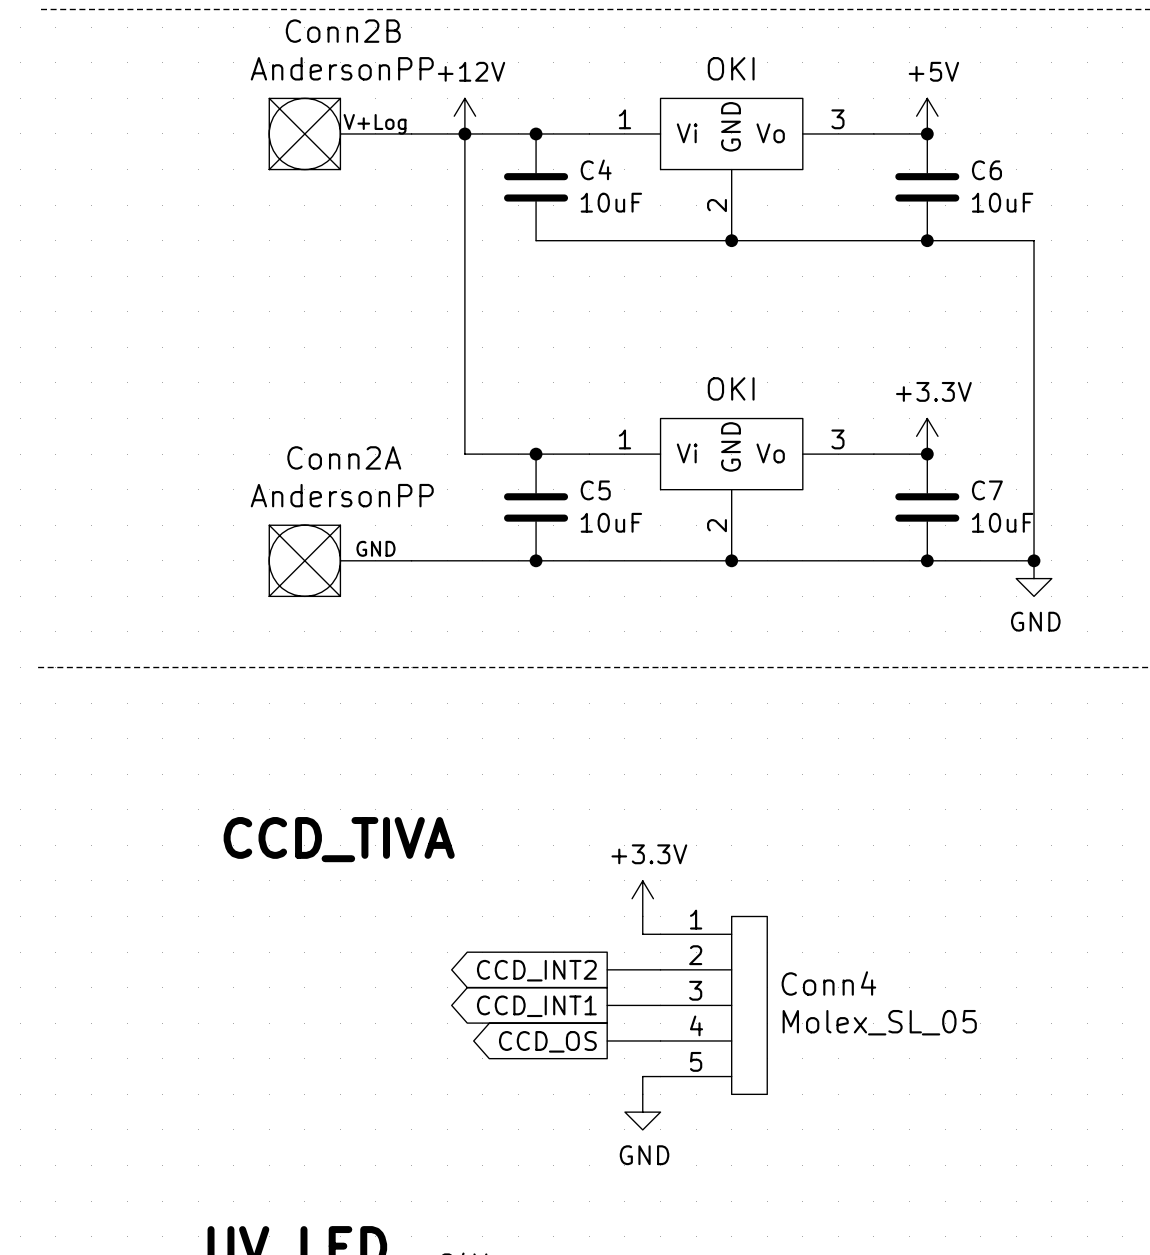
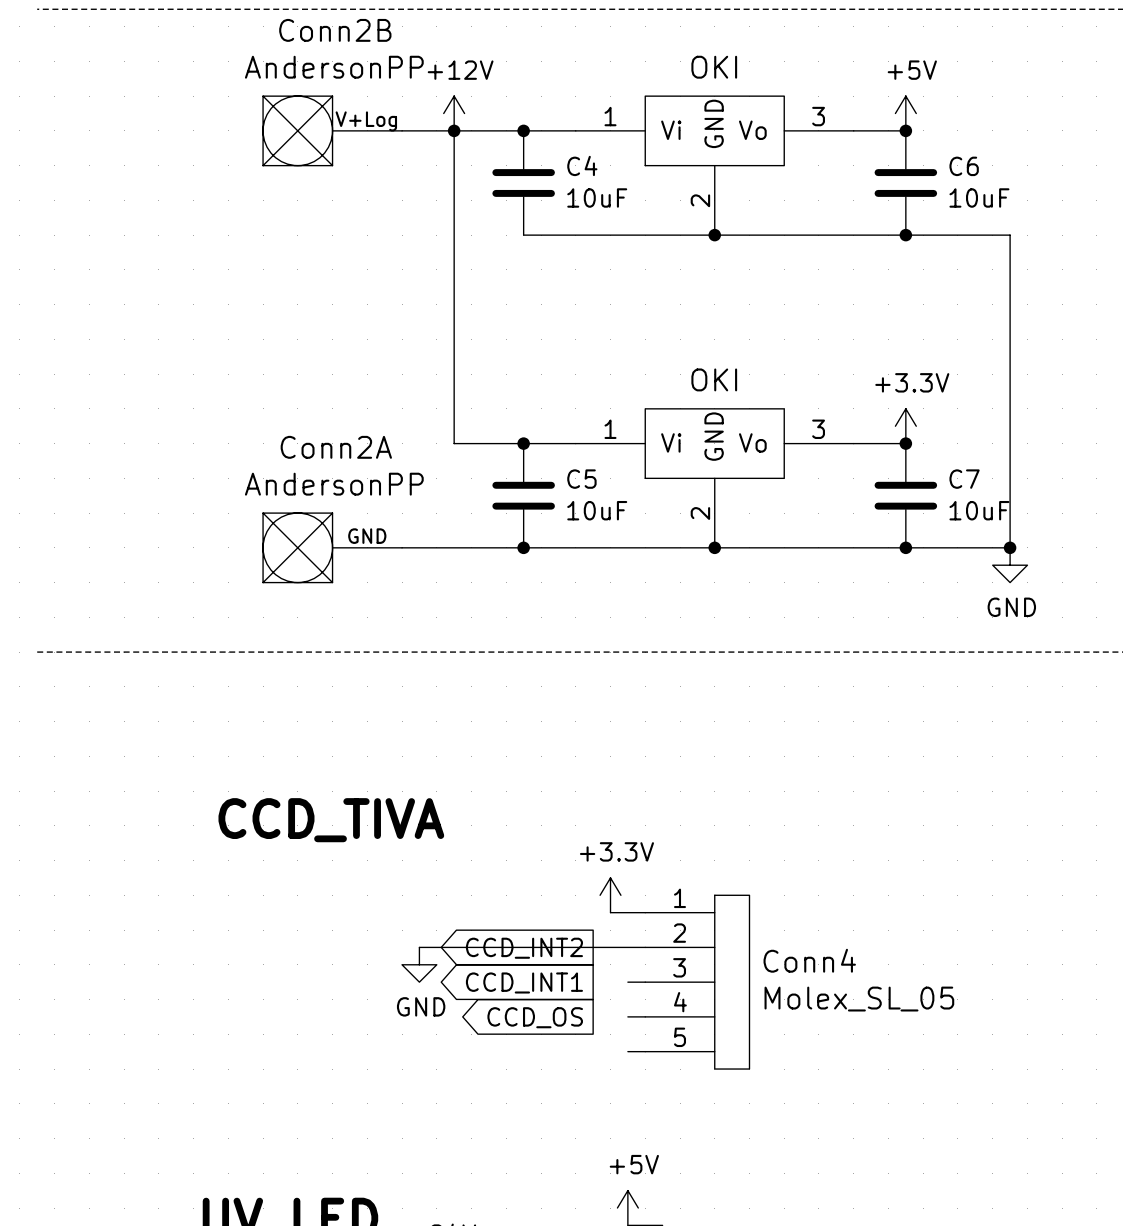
power symbol position: +3.3V (642, 898) -> +3.3V (610, 895)
wire: (642, 916) (642, 934) -> (610, 912) (627, 912)
wire: none -> (419, 947) (593, 947)
power symbol: none -> GND (419, 964)
wire: (607, 1005) (642, 1005) -> none
wire: (607, 1040) (642, 1040) -> (627, 1225) (662, 1225)
wire: (642, 1076) (642, 1094) -> none
power symbol: GND (642, 1112) -> none
power symbol: none -> +5V (627, 1208)

